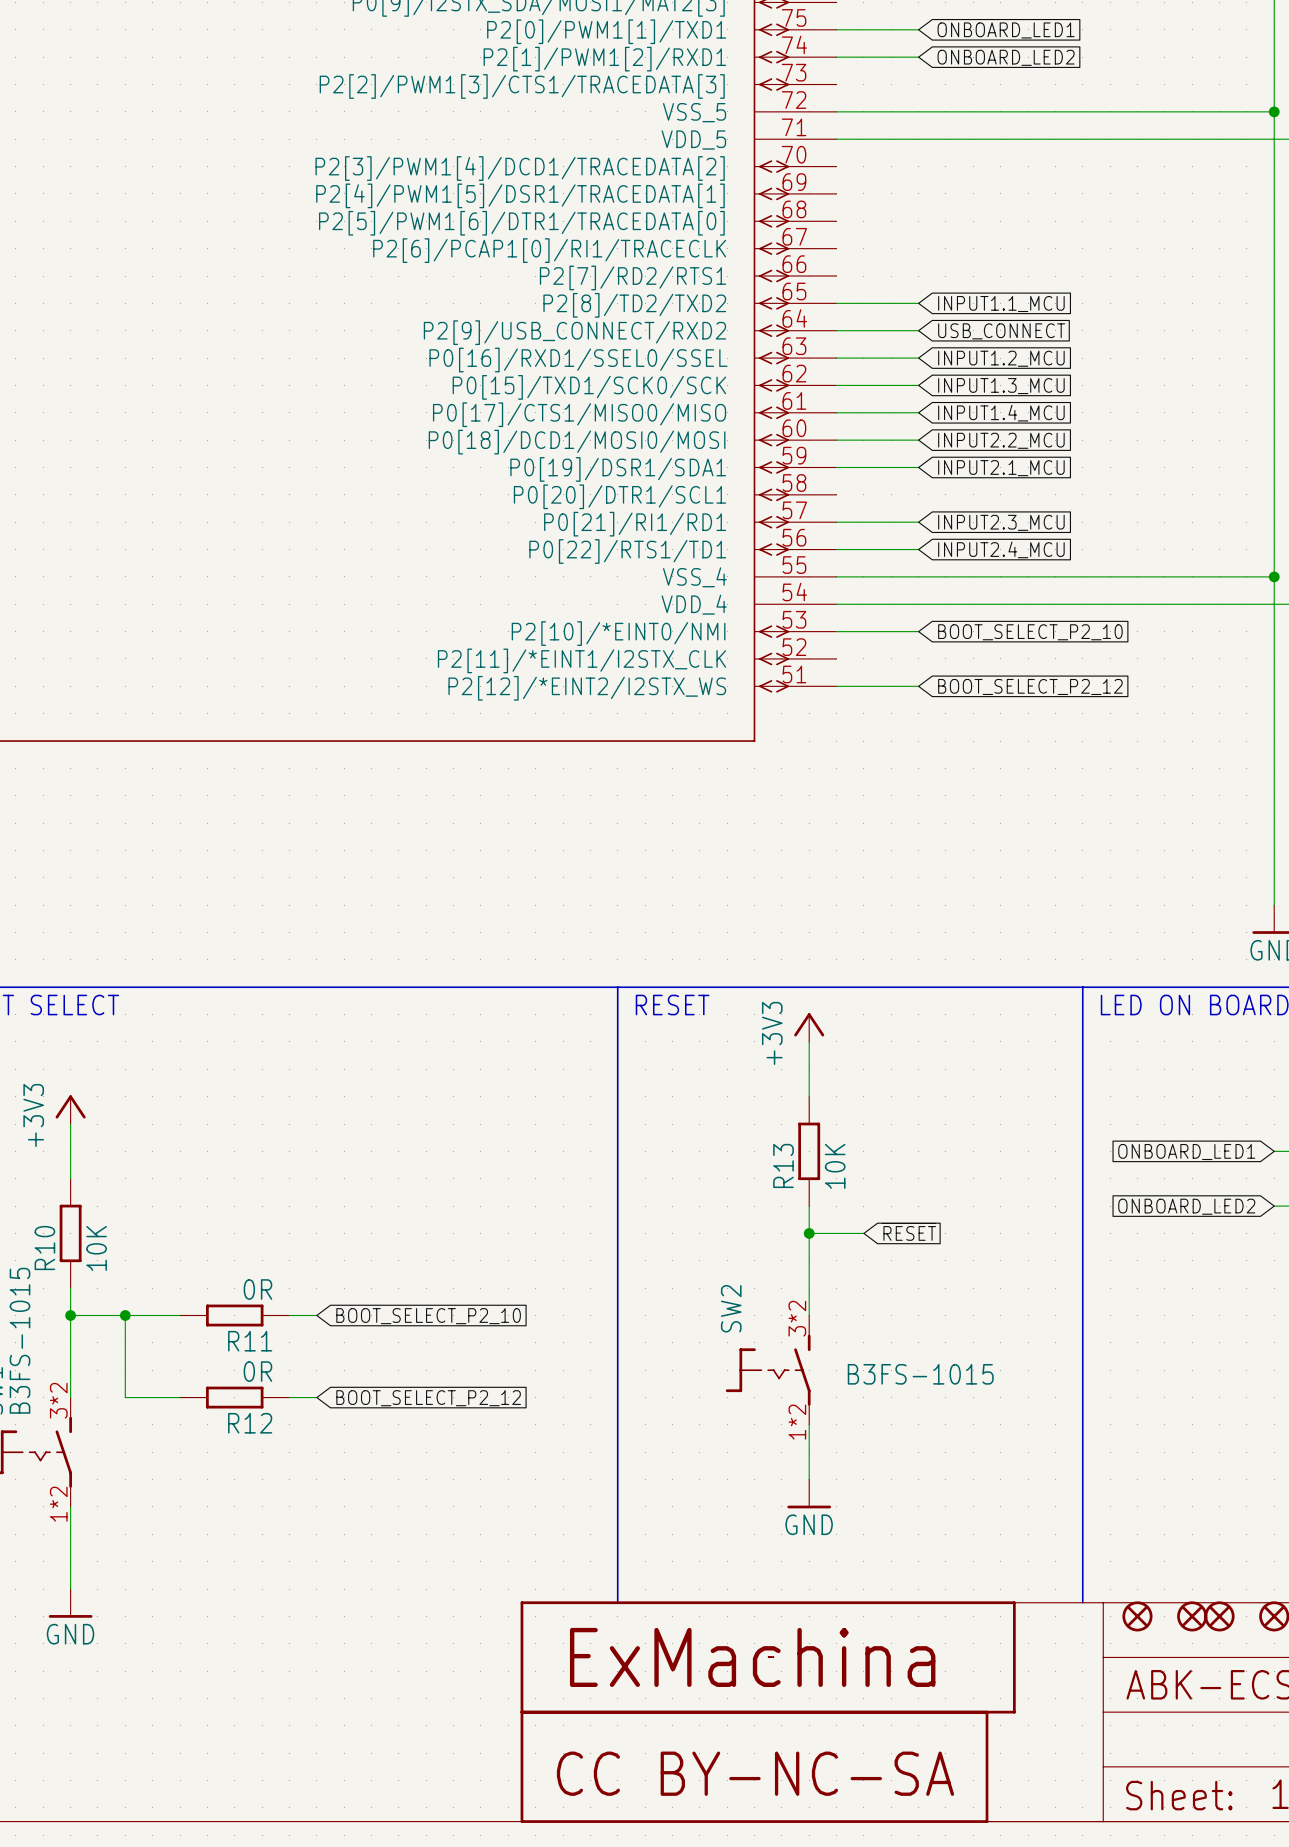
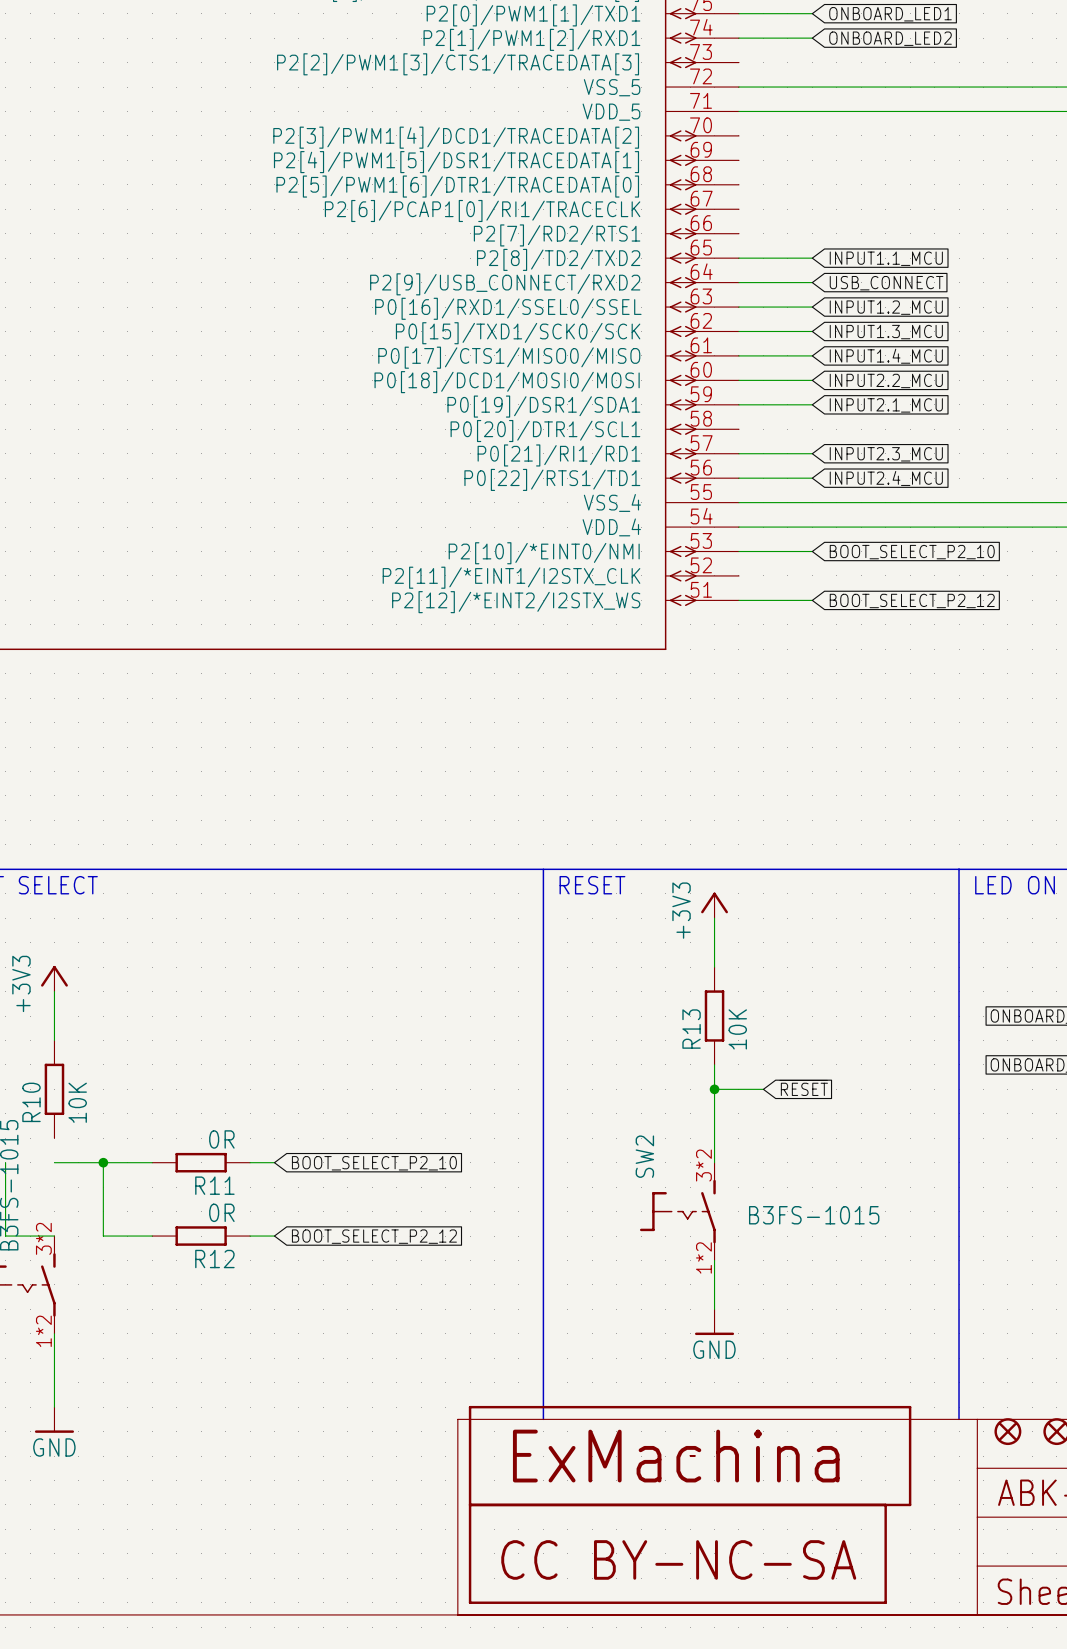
wire: (70, 1288) (70, 1397) -> (5, 1162) (5, 1236) (54, 1236)
junction: (70, 1315) -> none
part position: (768, 1657) -> (690, 1456)
part position: (754, 1766) -> (677, 1553)

